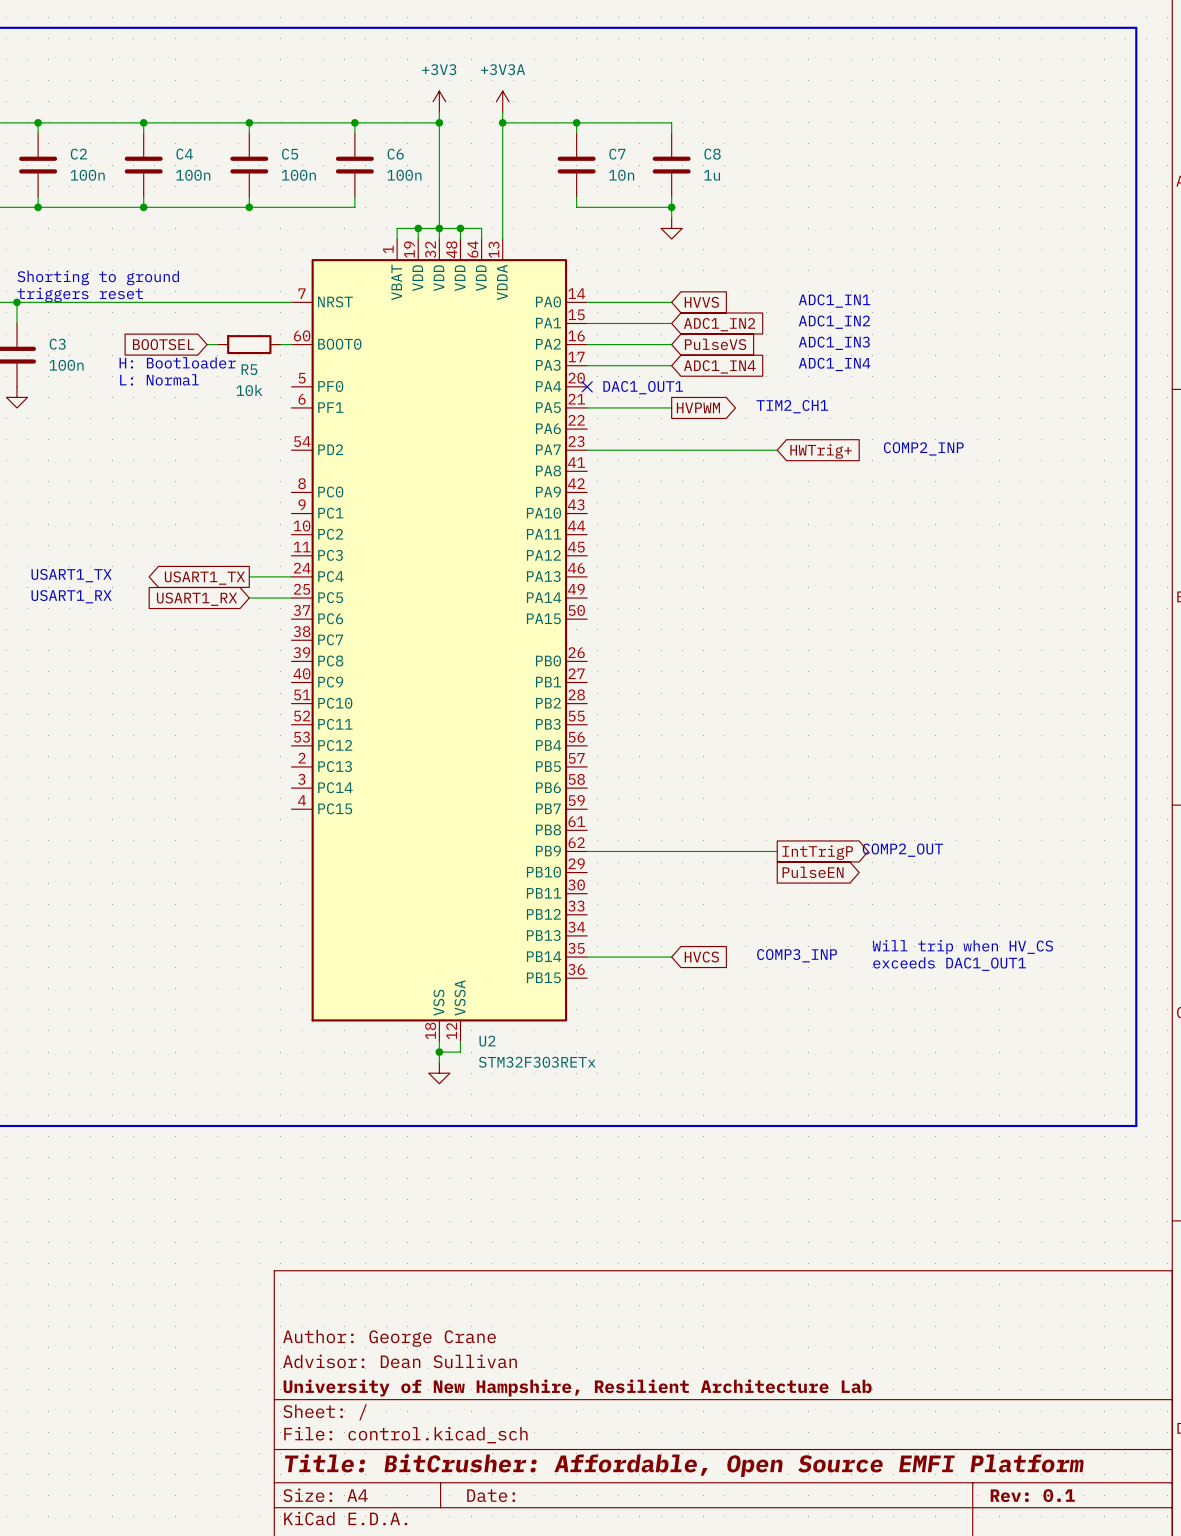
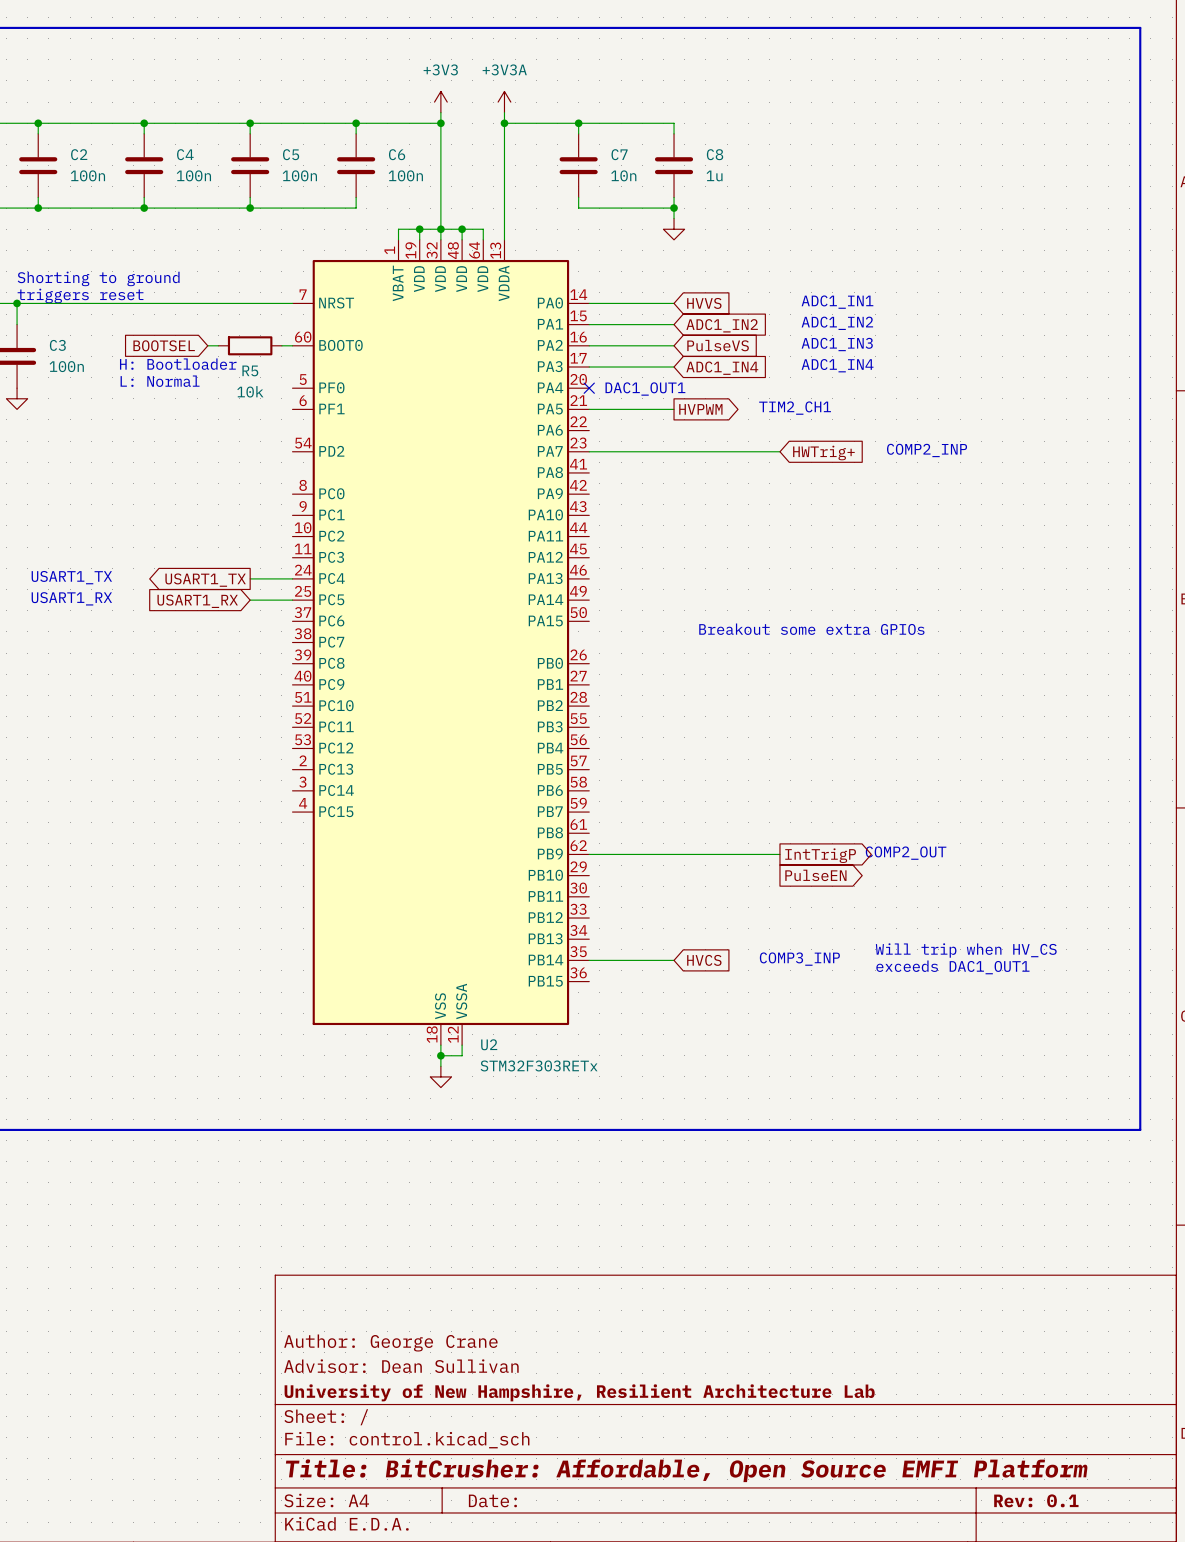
text: none -> Breakout some extra GPIOs (811, 629)

